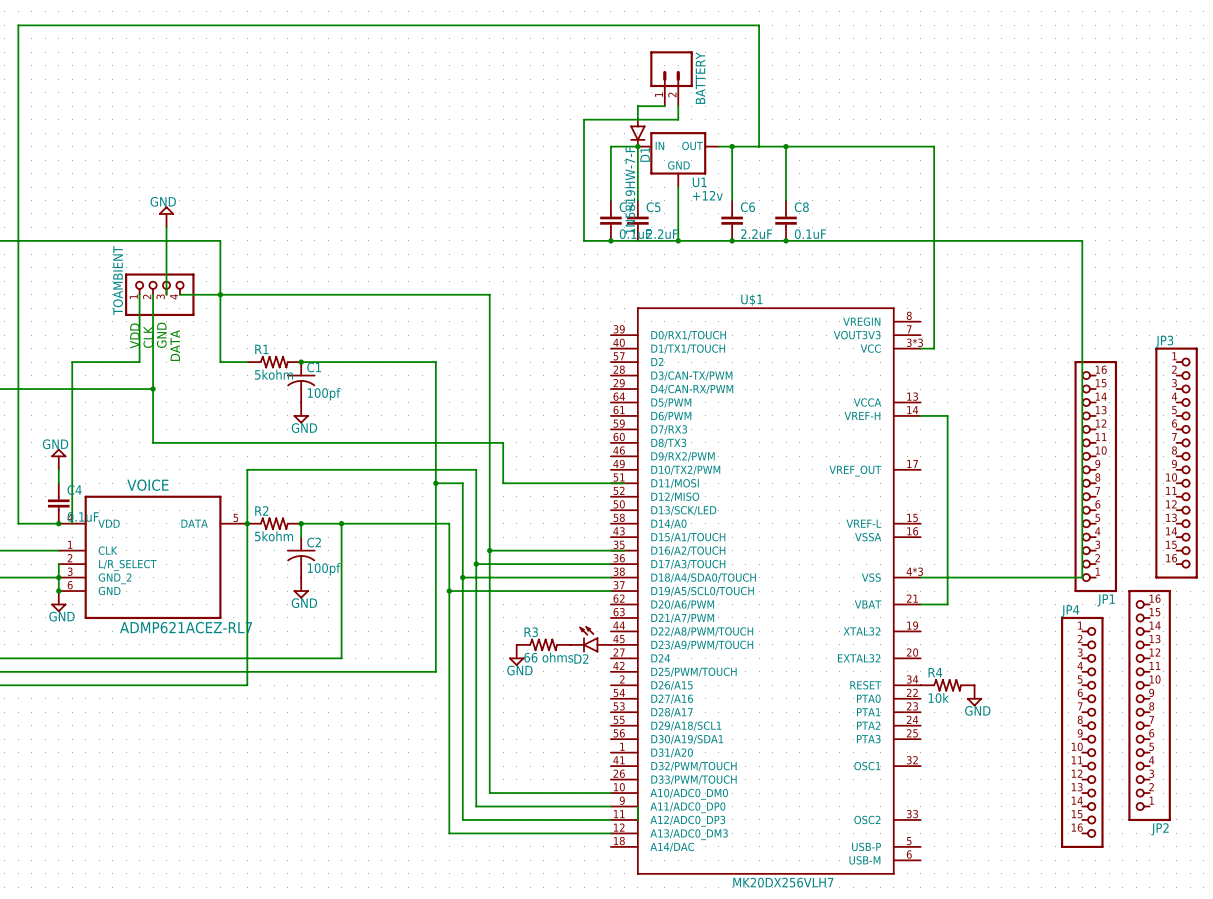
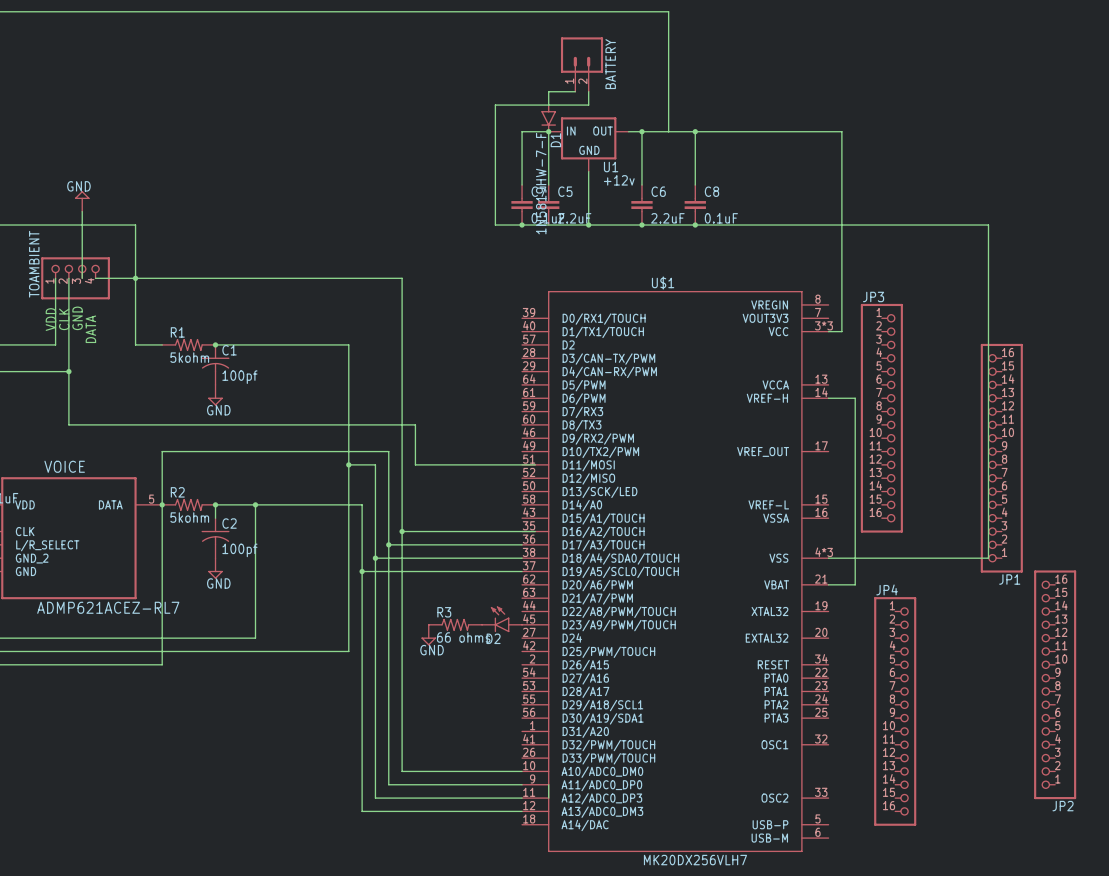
JP3 position: (1176, 463) -> (881, 418)
R4: 10k (947, 685) -> none
power symbol: GND (974, 695) -> none
JP4 position: (1082, 732) -> (895, 711)

